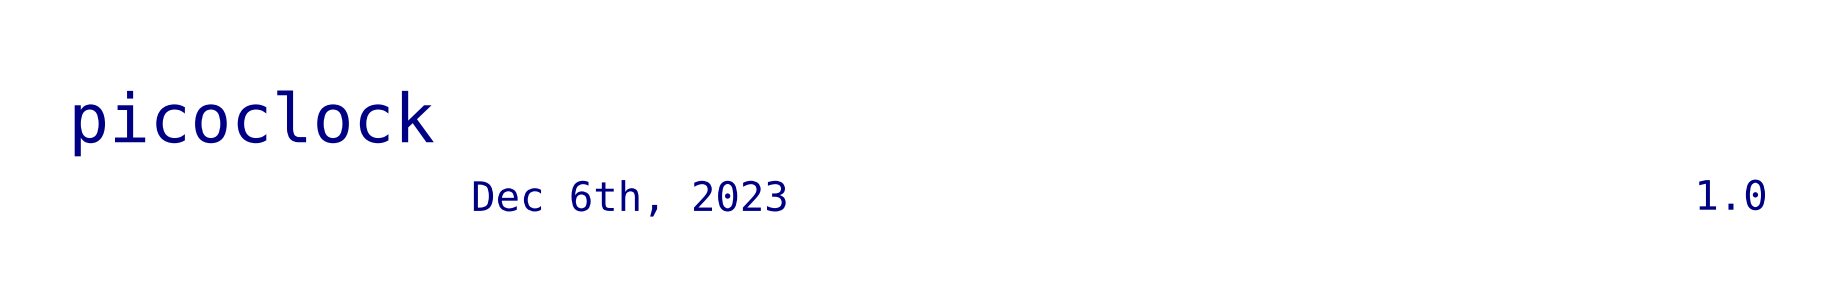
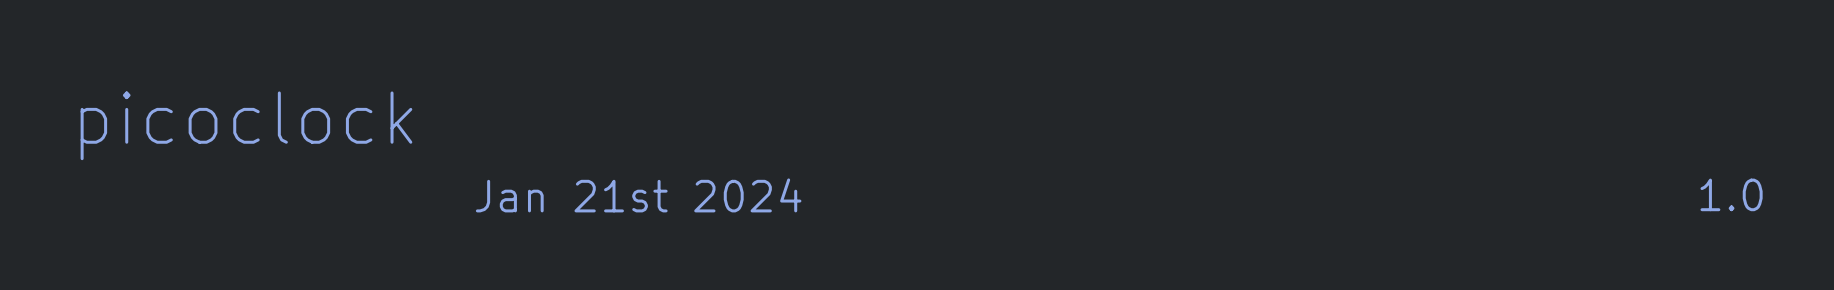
text: Dec 6th, 2023 (629, 198) -> Jan 21st 2024 (638, 195)

